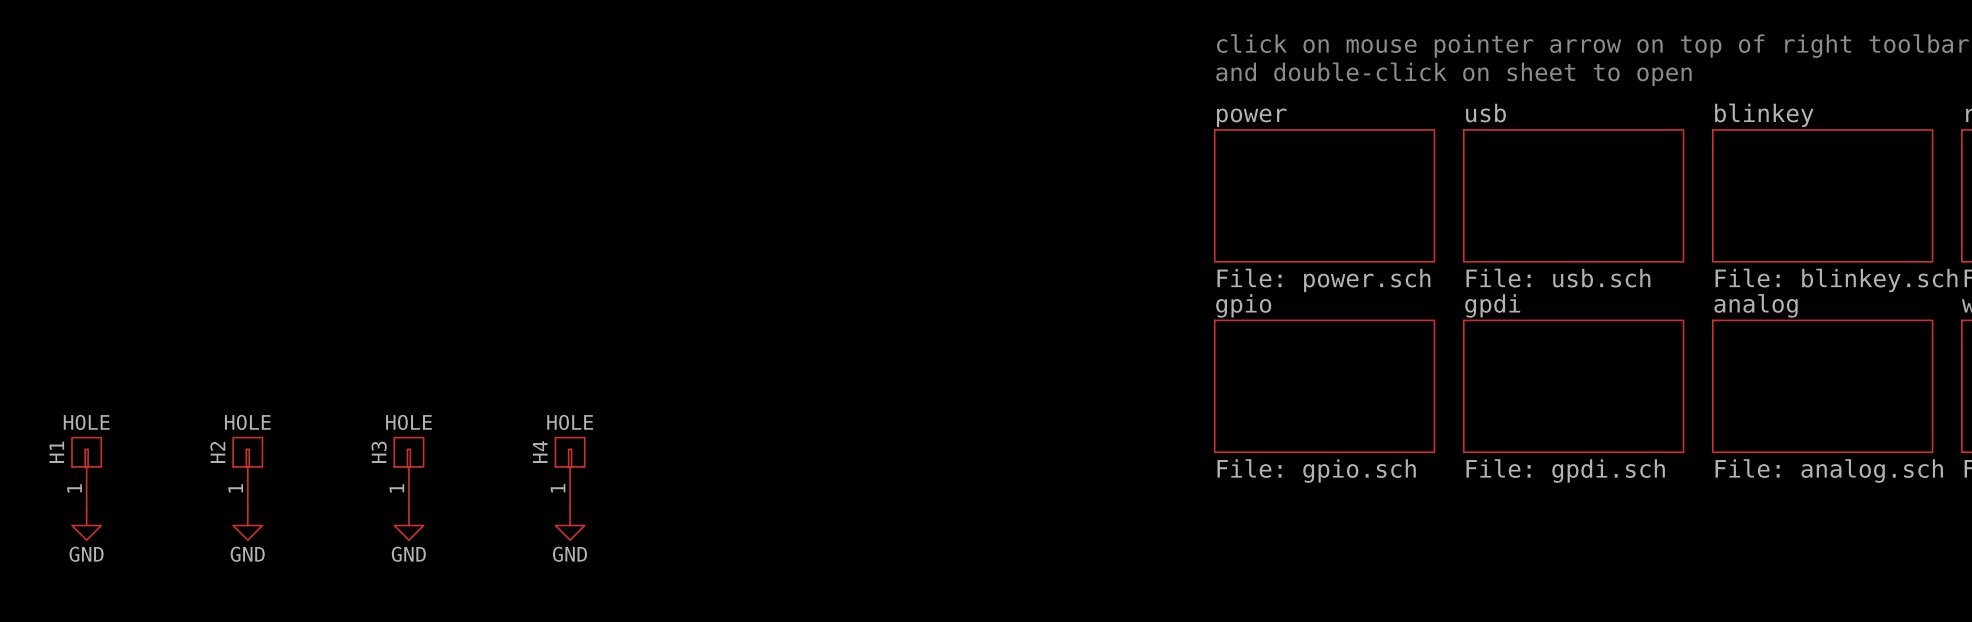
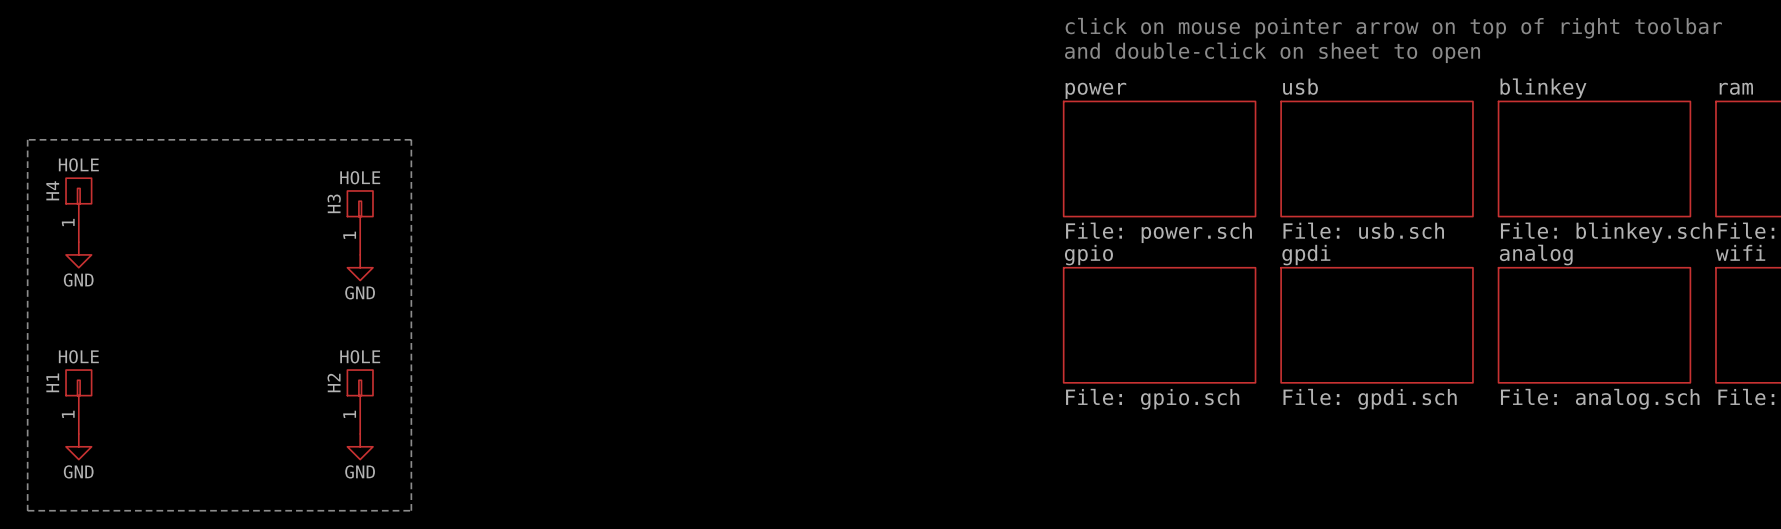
line: none -> (27, 139) (27, 510) (411, 510) (411, 139) (27, 139)
H3: none -> HOLE (360, 222)
power symbol: none -> GND (78, 254)
power symbol: none -> GND (360, 267)
H3 name: H3 (379, 452) -> H2 (334, 382)
H2: HOLE (247, 474) -> none
H4 position: (570, 474) -> (78, 210)
power symbol: GND (247, 525) -> none
power symbol: GND (570, 525) -> none

